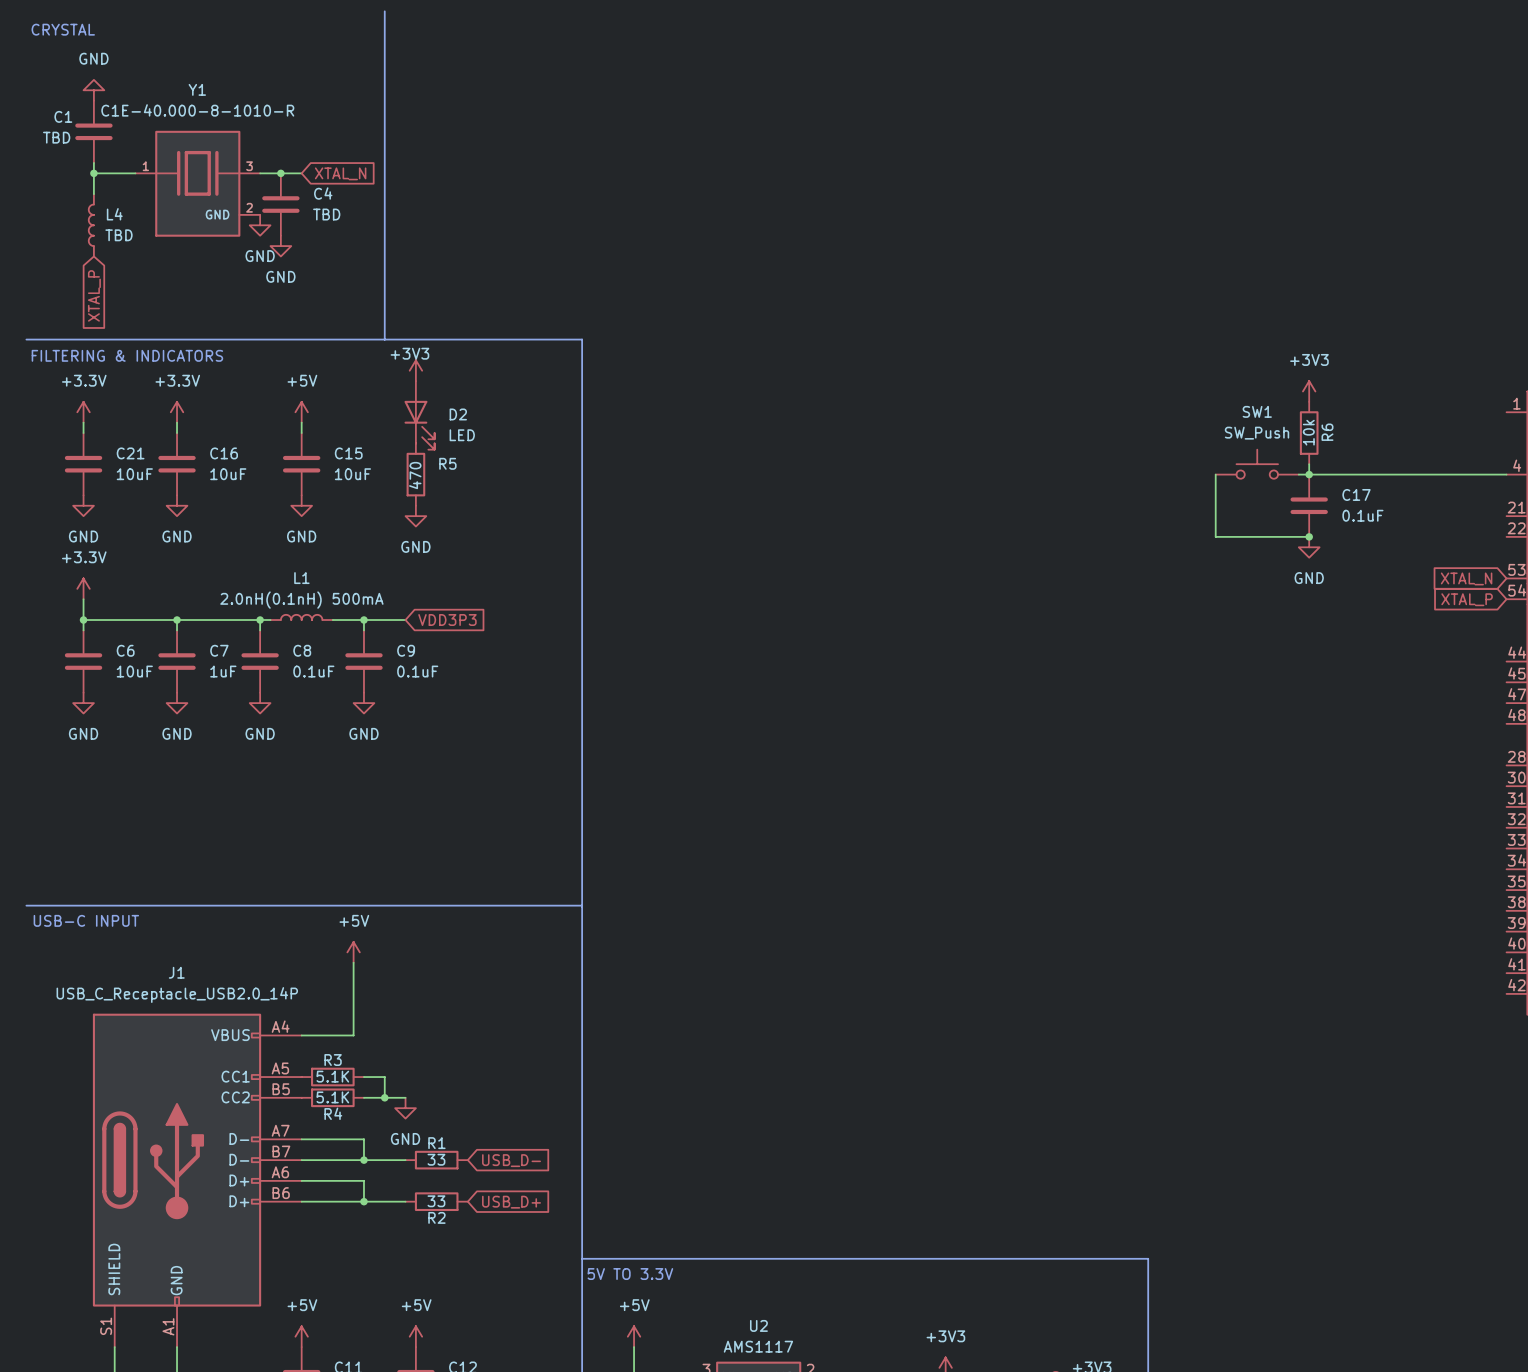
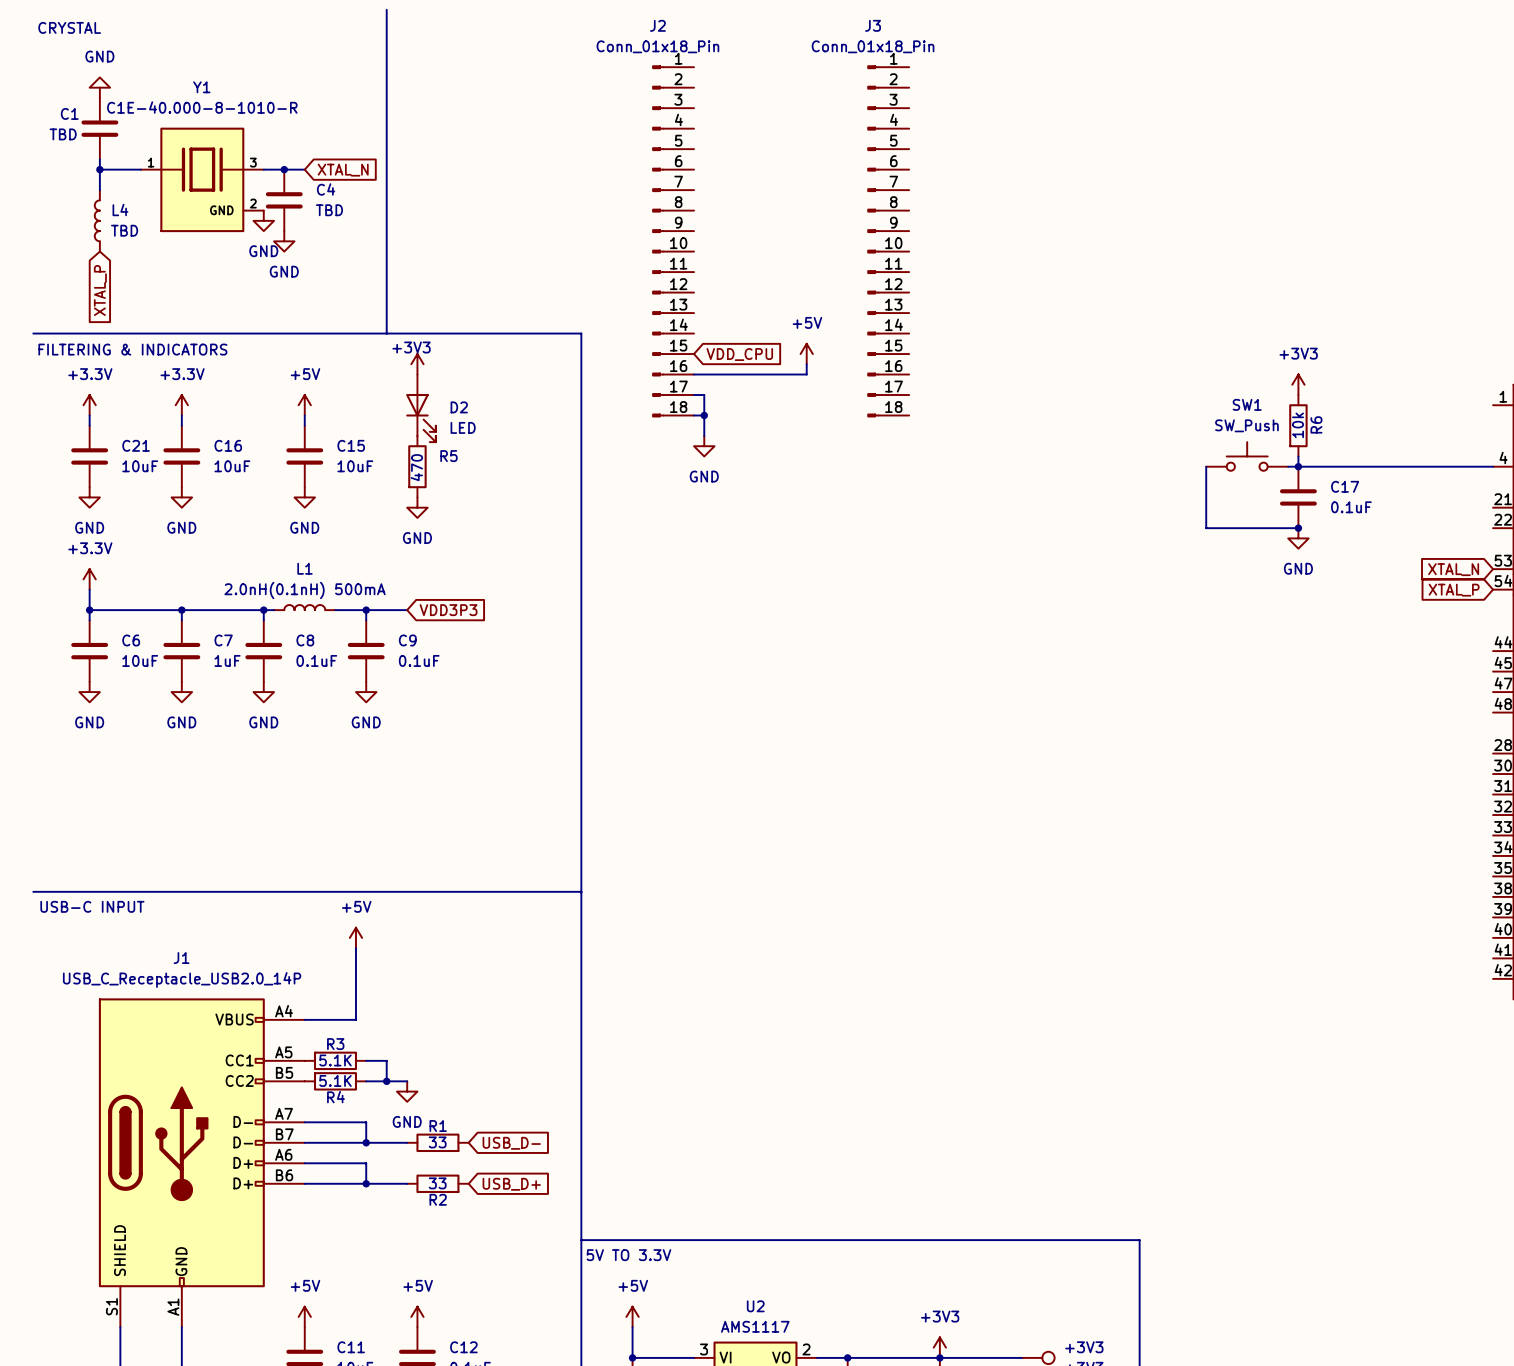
J2: none -> Conn_01x18_Pin (673, 241)
J3: none -> Conn_01x18_Pin (888, 241)
global label: none -> VDD_CPU (739, 354)
power symbol: none -> +5V (806, 354)
wire: none -> (806, 364) (806, 374) (694, 374)
wire: none -> (694, 395) (704, 395) (704, 435)
wire: none -> (694, 415) (704, 415)
junction: none -> (704, 415)
power symbol: none -> GND (704, 446)

